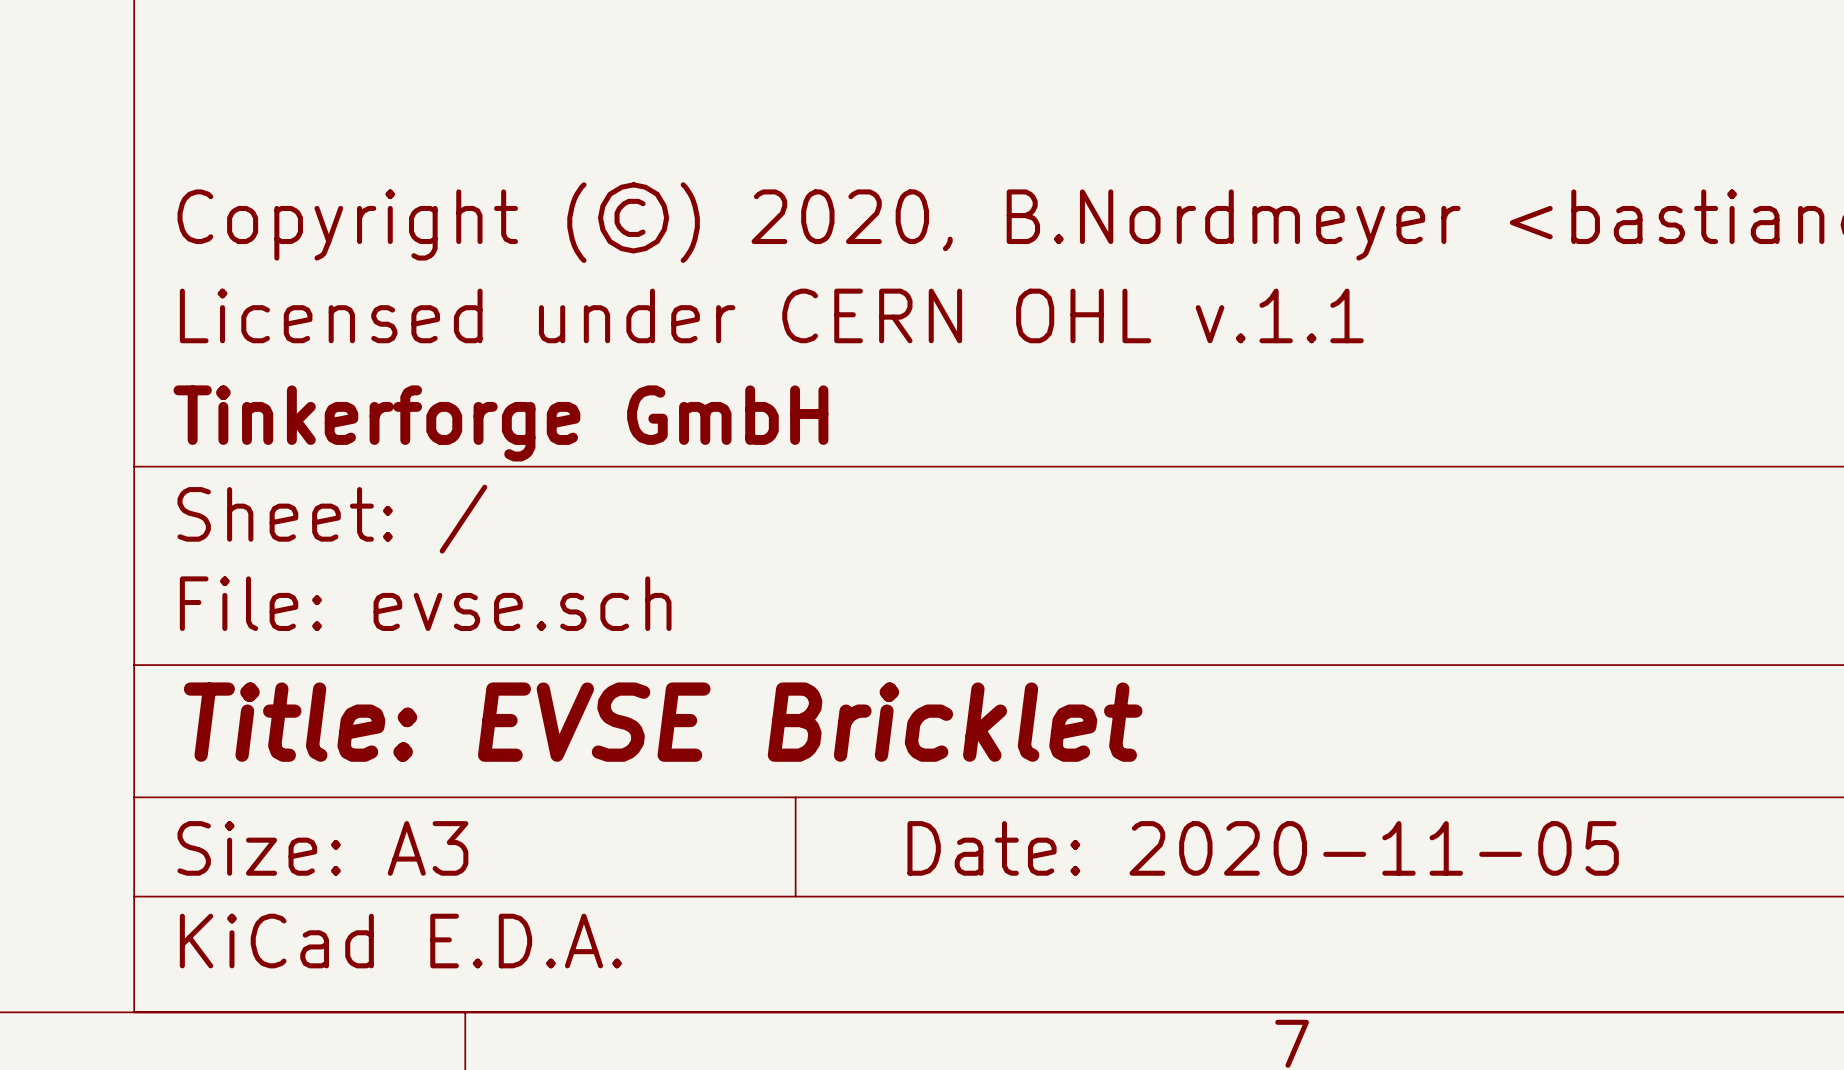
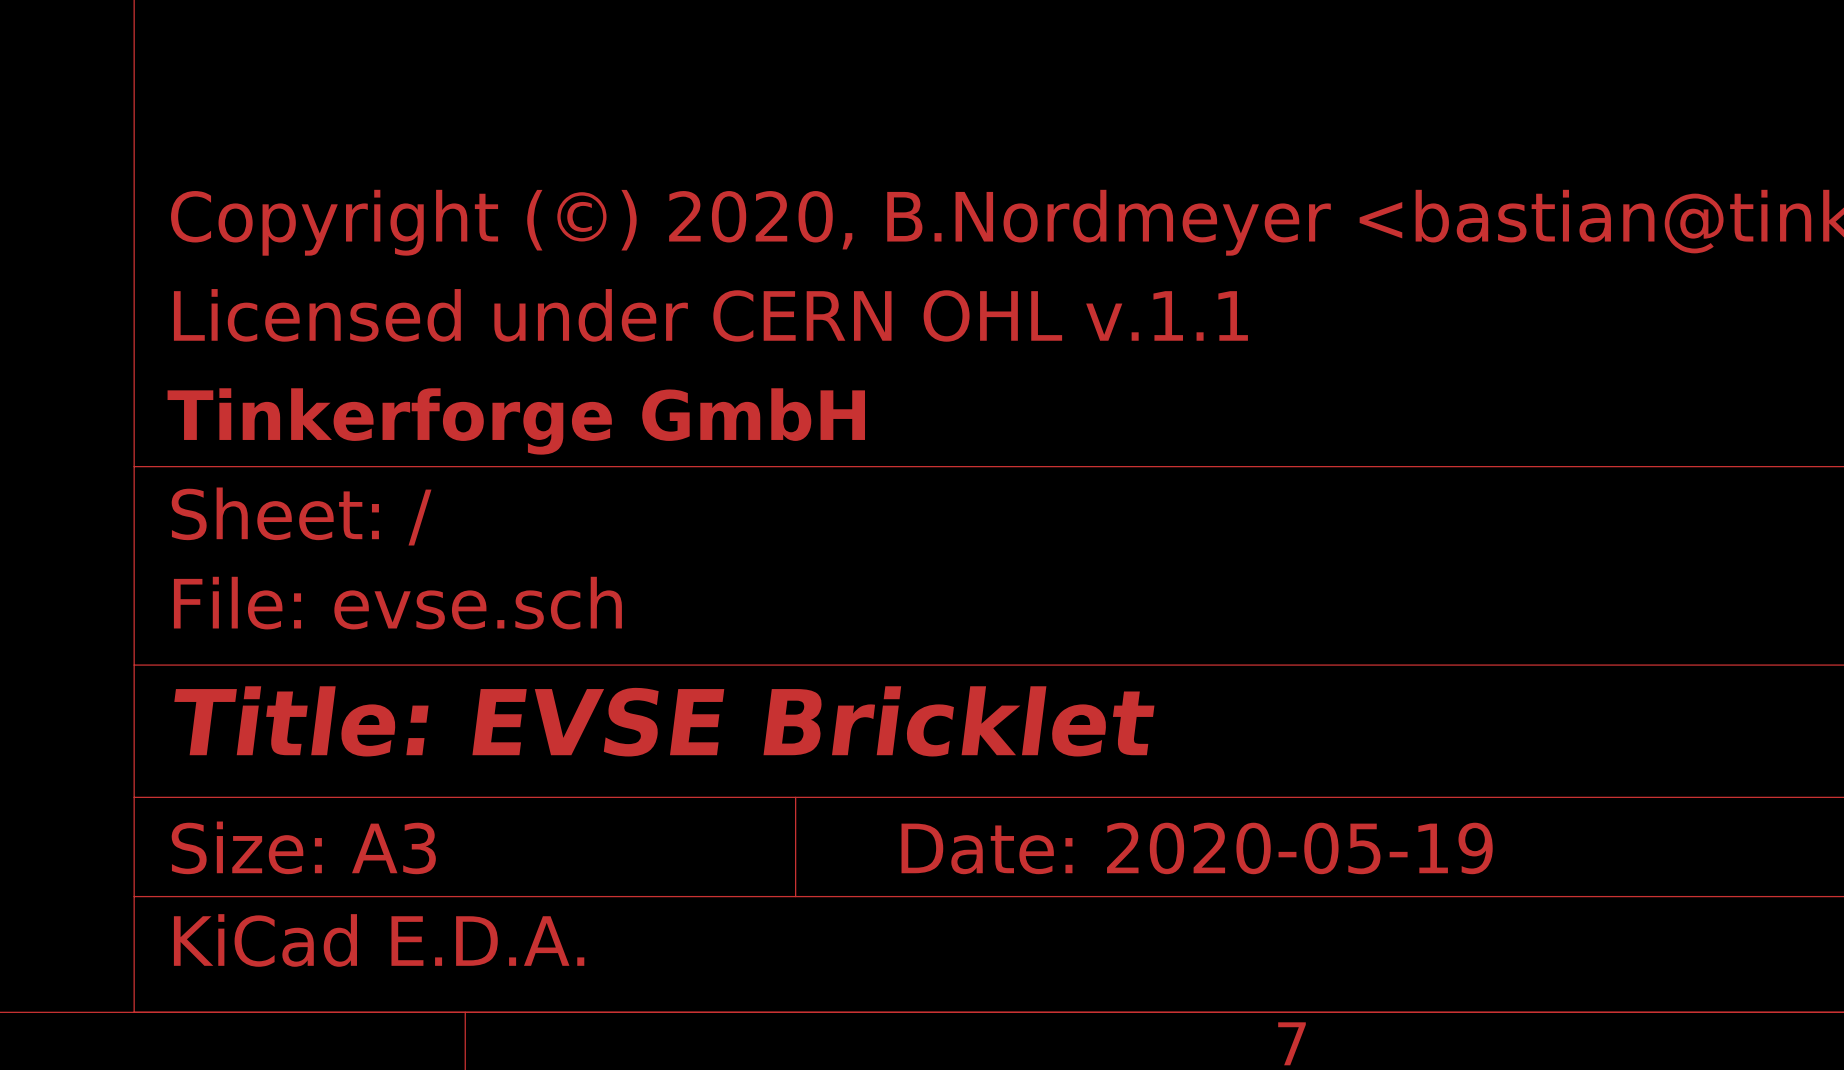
title block: Date: 2020-11-05 (1263, 848) -> Date: 2020-05-19 (1197, 848)

